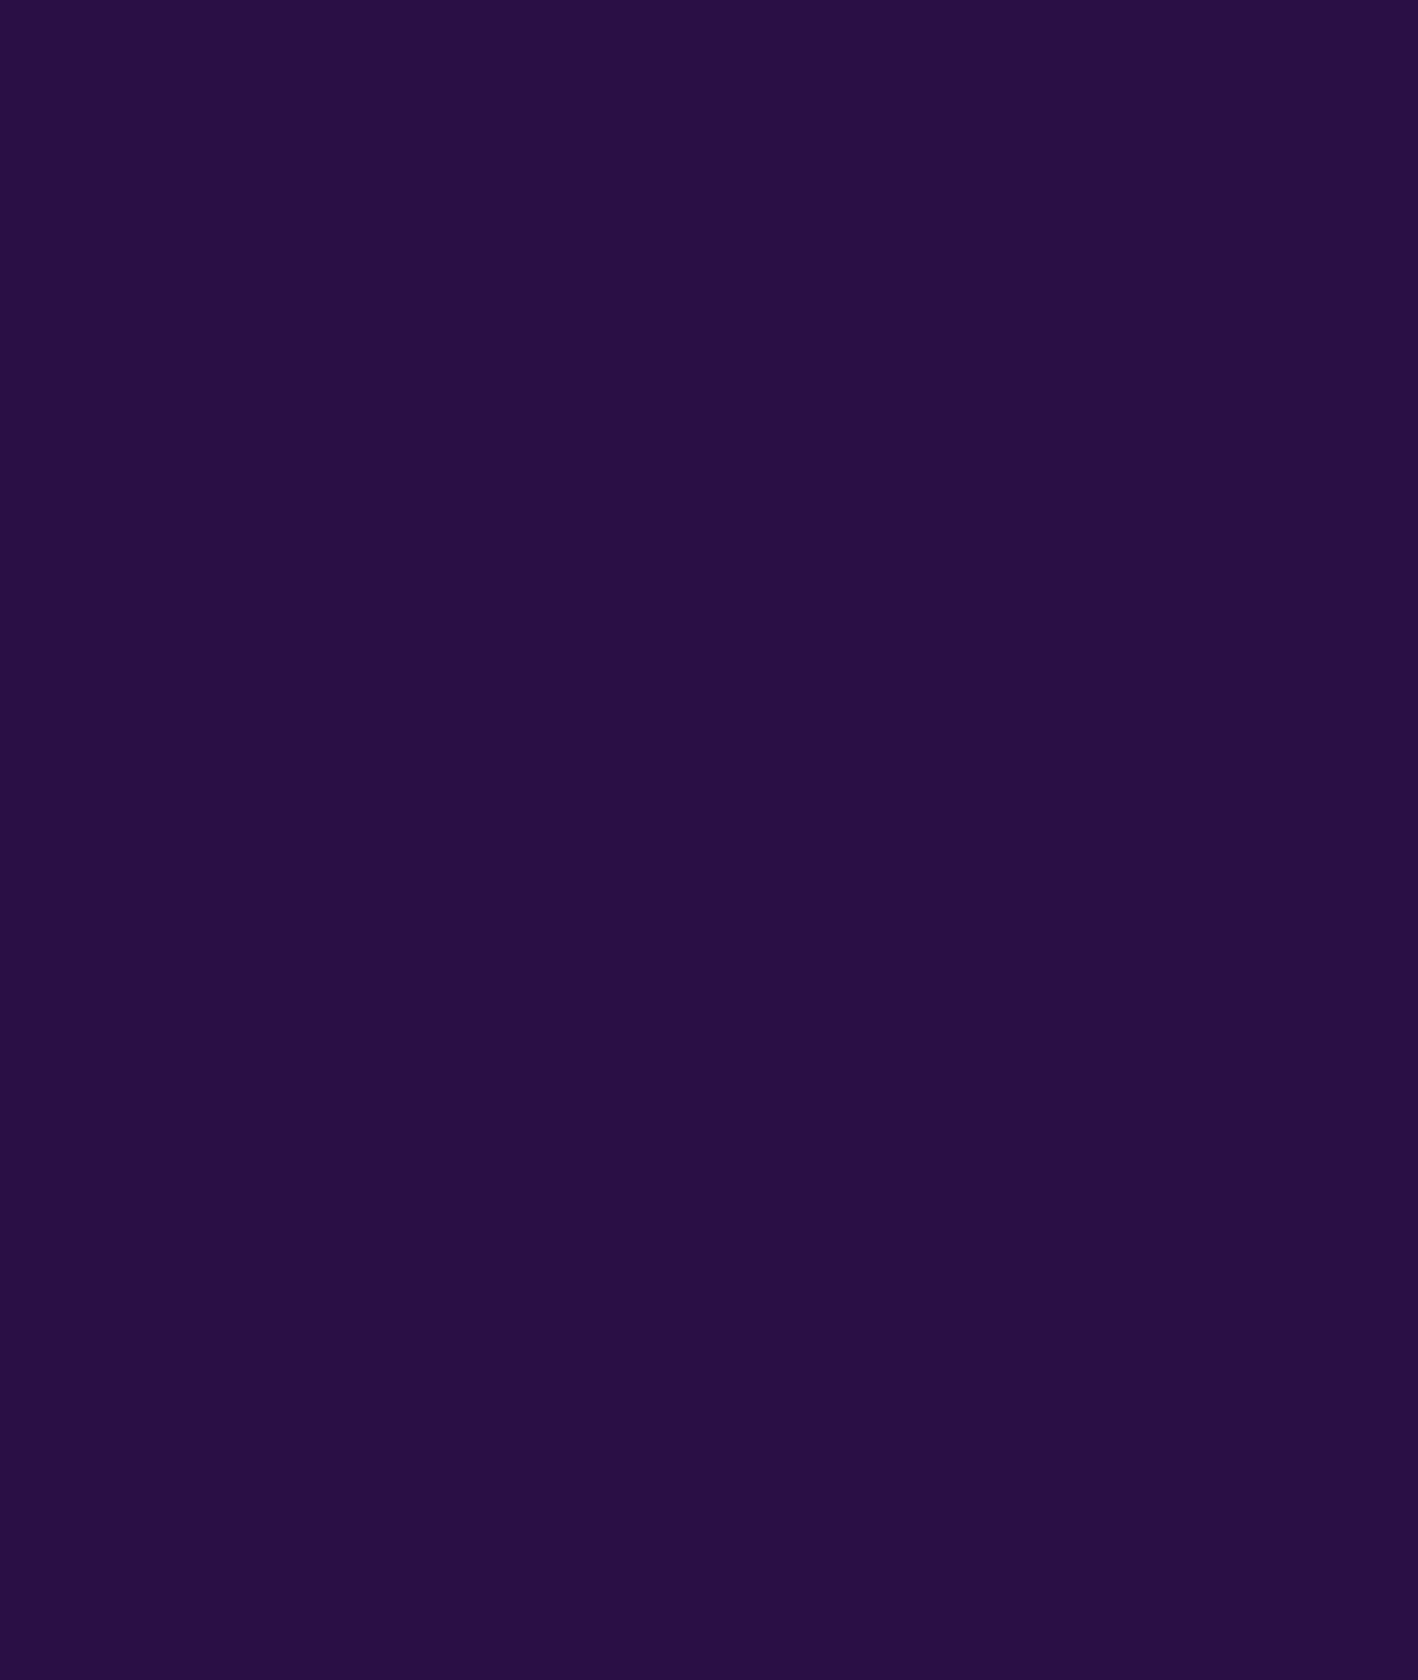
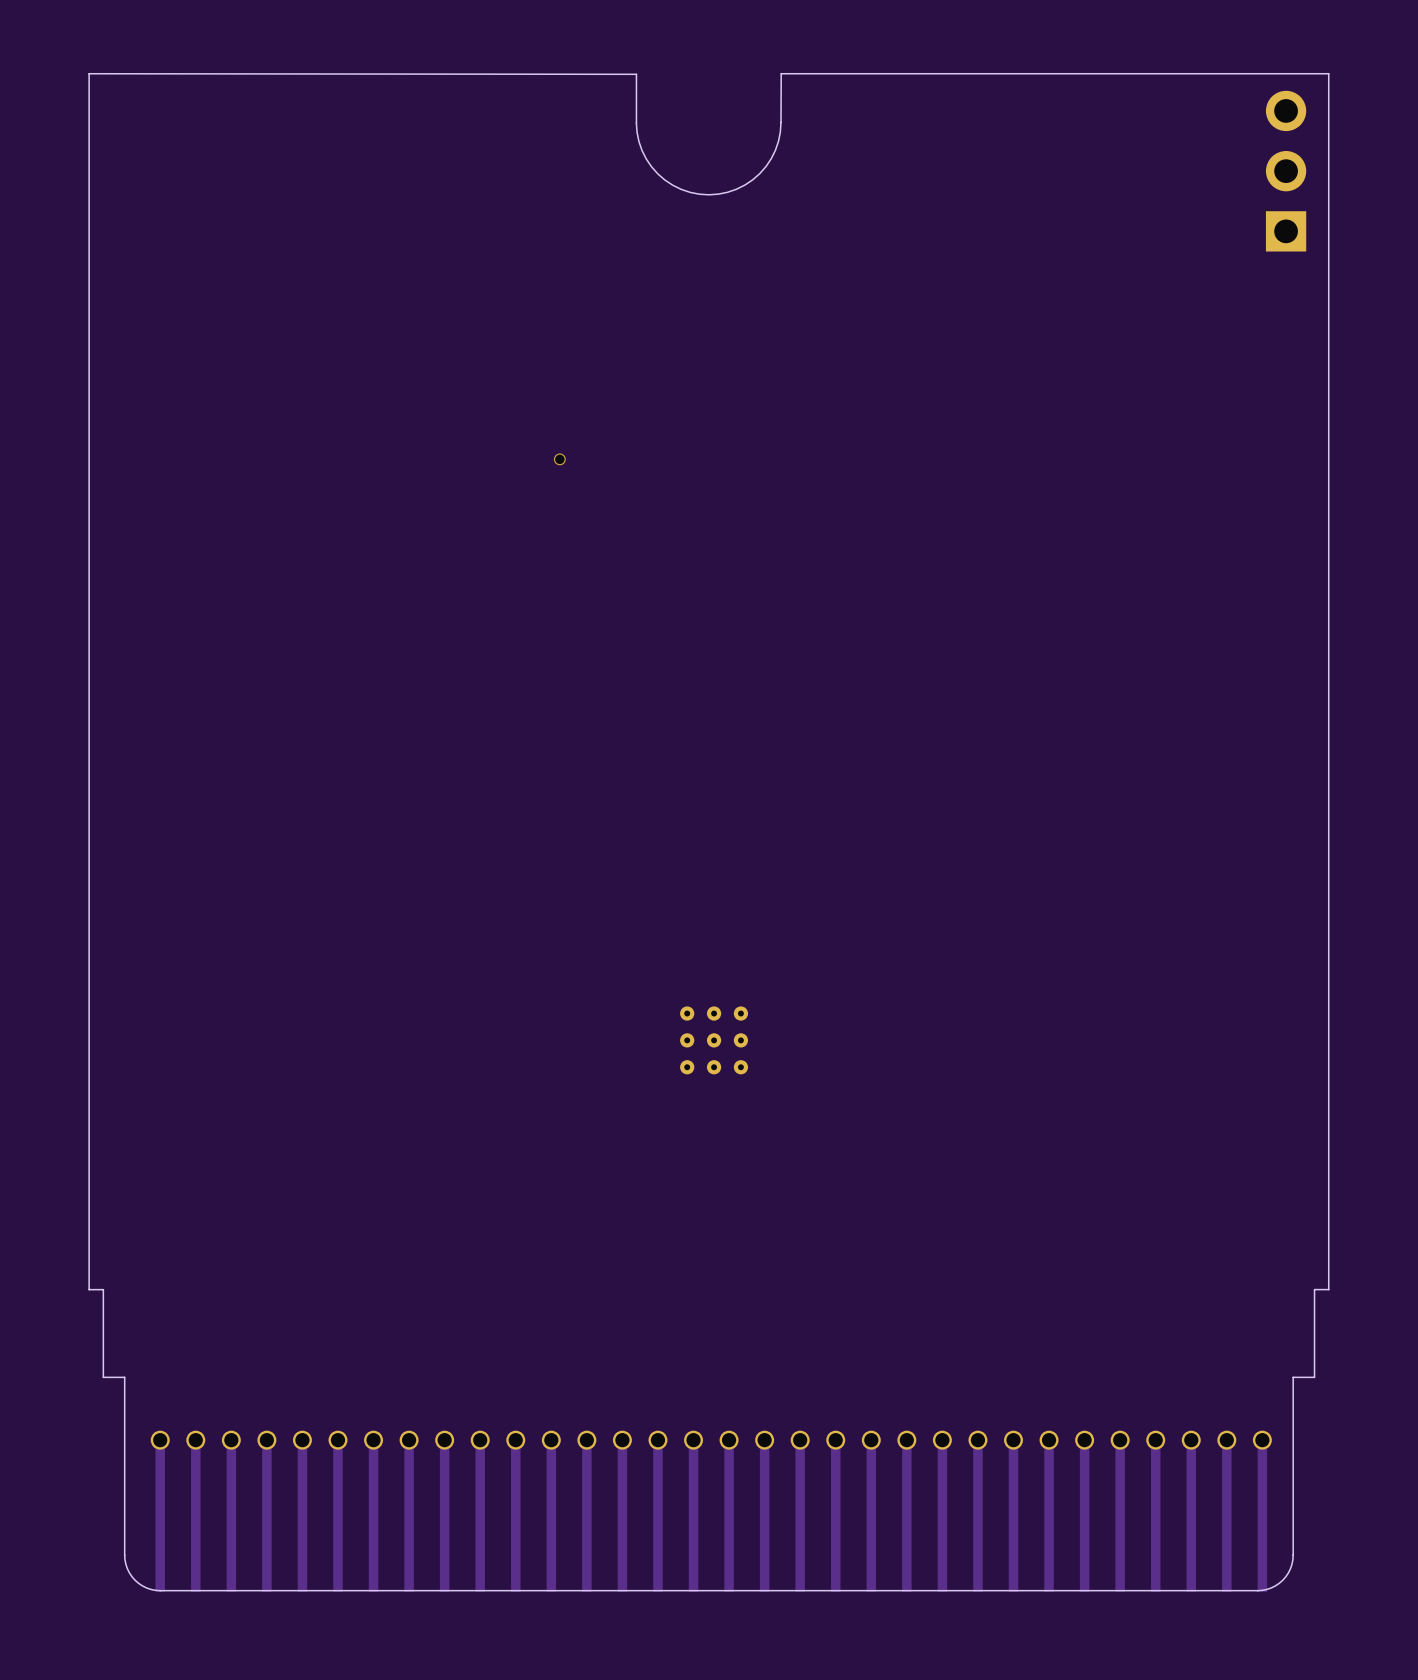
board edge: none -> (1328, 73) (781, 73) (780, 131) (771, 158) (759, 173) (744, 185) (727, 192) (708, 194) (690, 192) (672, 185) (657, 173) (646, 158) (637, 132) (636, 74) (89, 73) (89, 1289) (103, 1289) (103, 1377) (124, 1377) (124, 1559) (129, 1572) (138, 1583) (151, 1589) (160, 1590) (1257, 1590) (1275, 1585) (1285, 1576) (1290, 1568) (1293, 1555) (1293, 1377) (1314, 1377) (1314, 1289) (1328, 1289) (1328, 73)
part: none -> (1286, 171)
via: none -> (559, 459)
part: none -> (714, 1040)
part: none -> (711, 1511)

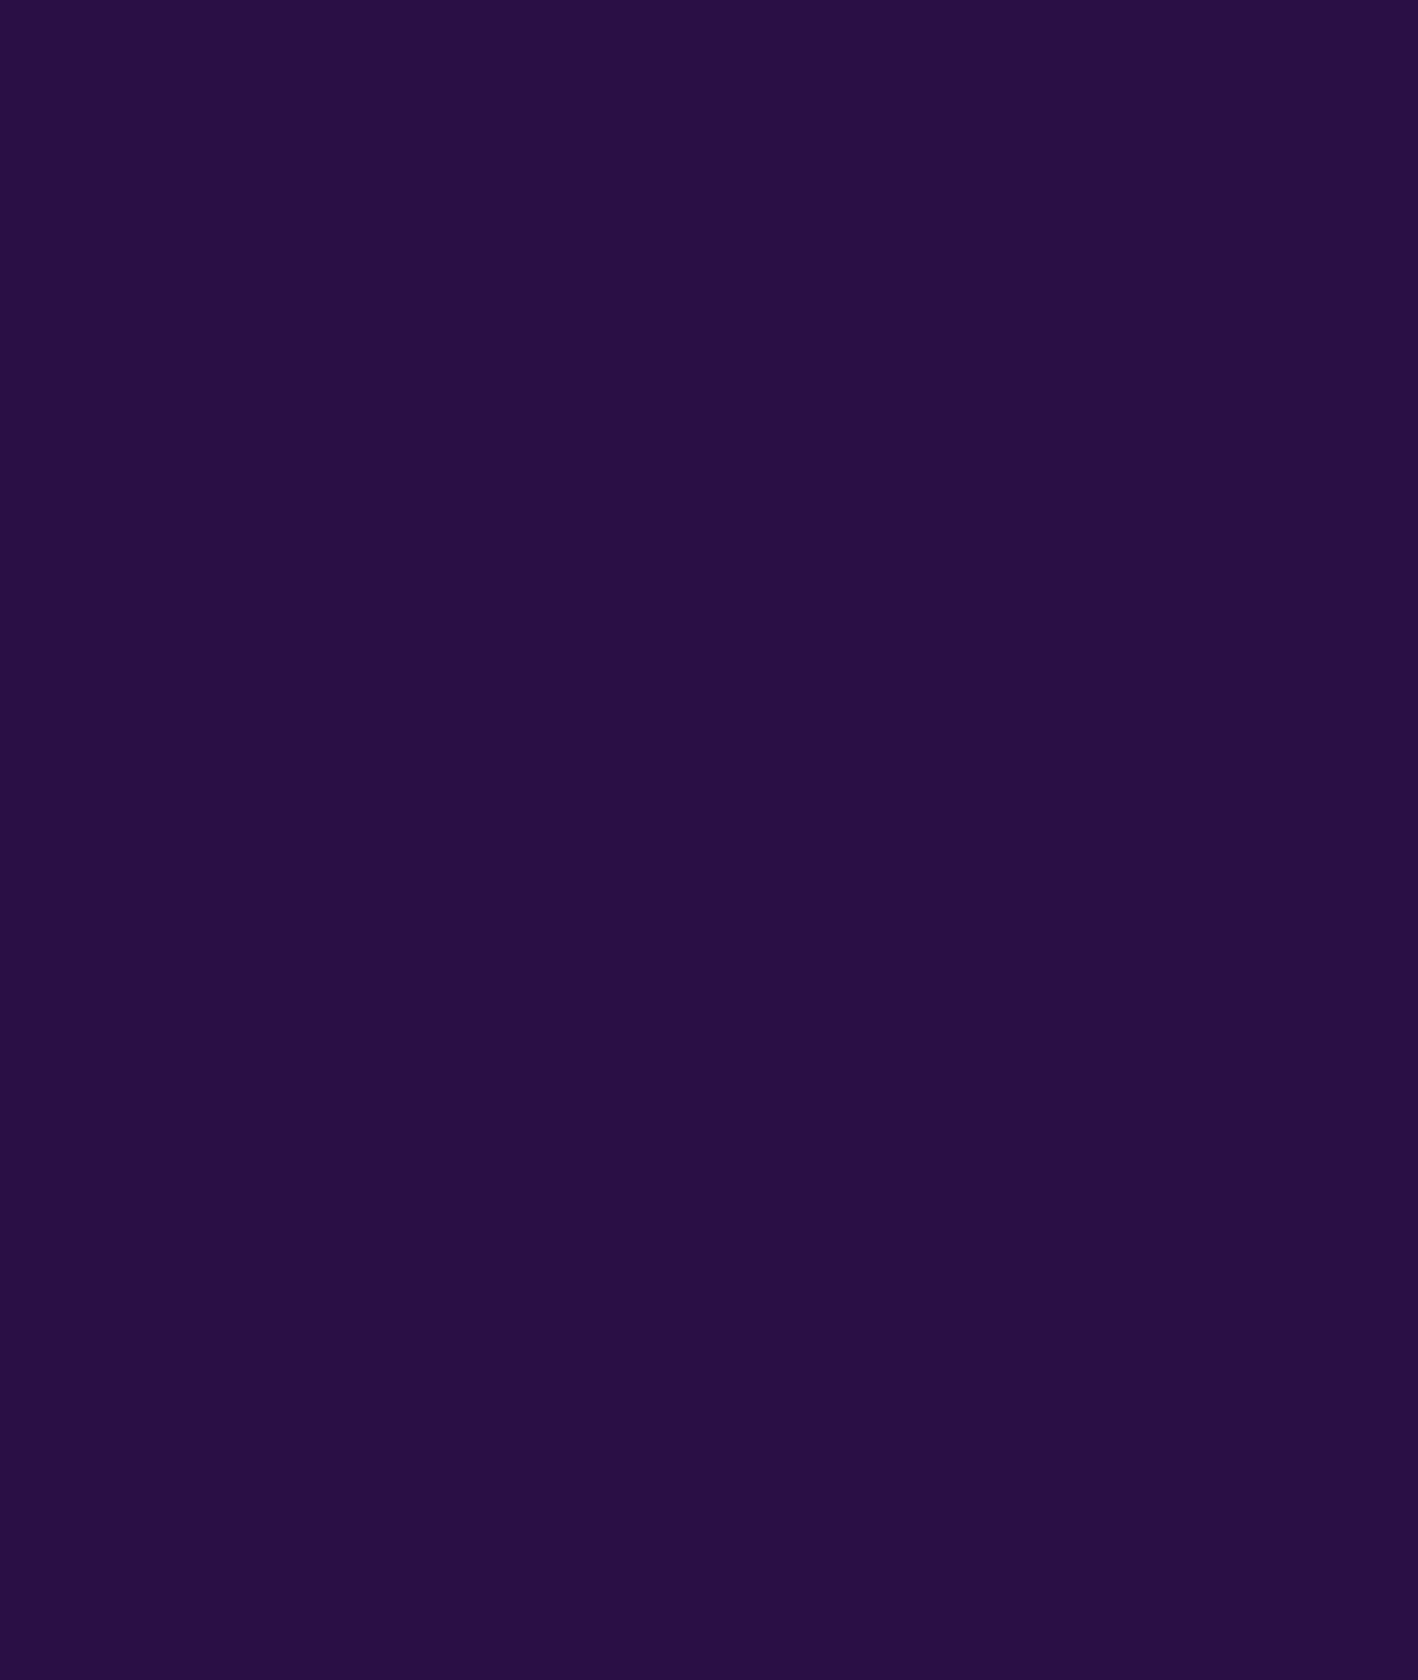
board edge: (1328, 73) (781, 73) (780, 131) (771, 158) (759, 173) (744, 185) (727, 192) (708, 194) (690, 192) (672, 185) (657, 173) (646, 158) (637, 132) (636, 74) (89, 73) (89, 1289) (103, 1289) (103, 1377) (124, 1377) (124, 1559) (129, 1572) (138, 1583) (151, 1589) (160, 1590) (1257, 1590) (1275, 1585) (1285, 1576) (1290, 1568) (1293, 1555) (1293, 1377) (1314, 1377) (1314, 1289) (1328, 1289) (1328, 73) -> none
part: (1286, 171) -> none
via: (559, 459) -> none
part: (714, 1040) -> none
part: (711, 1511) -> none

